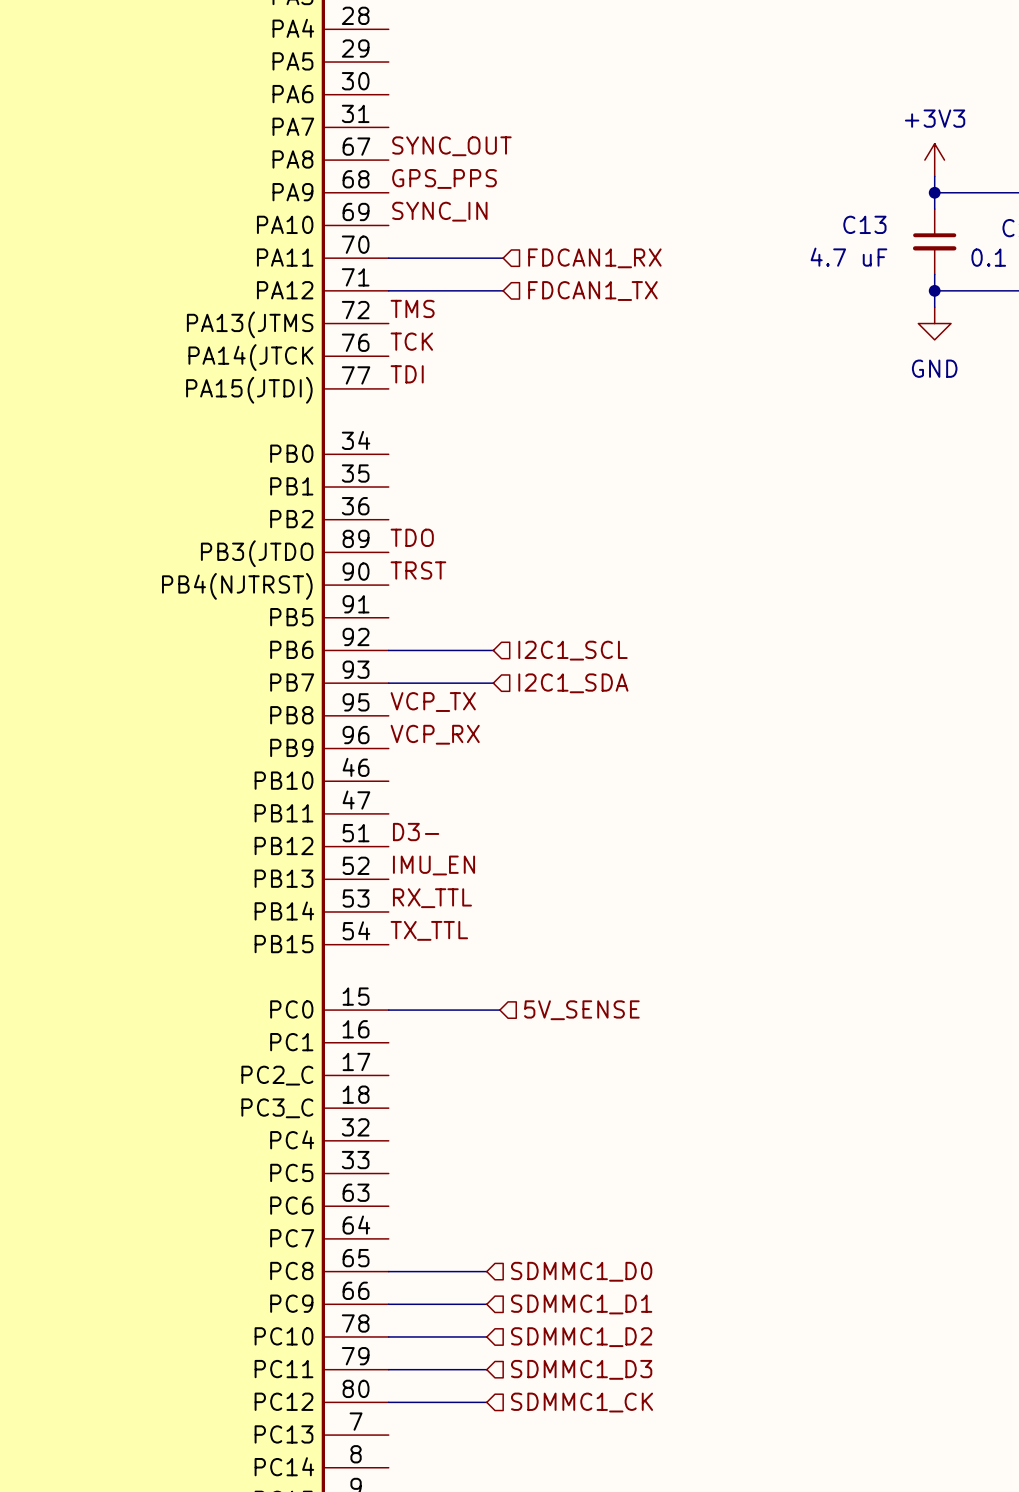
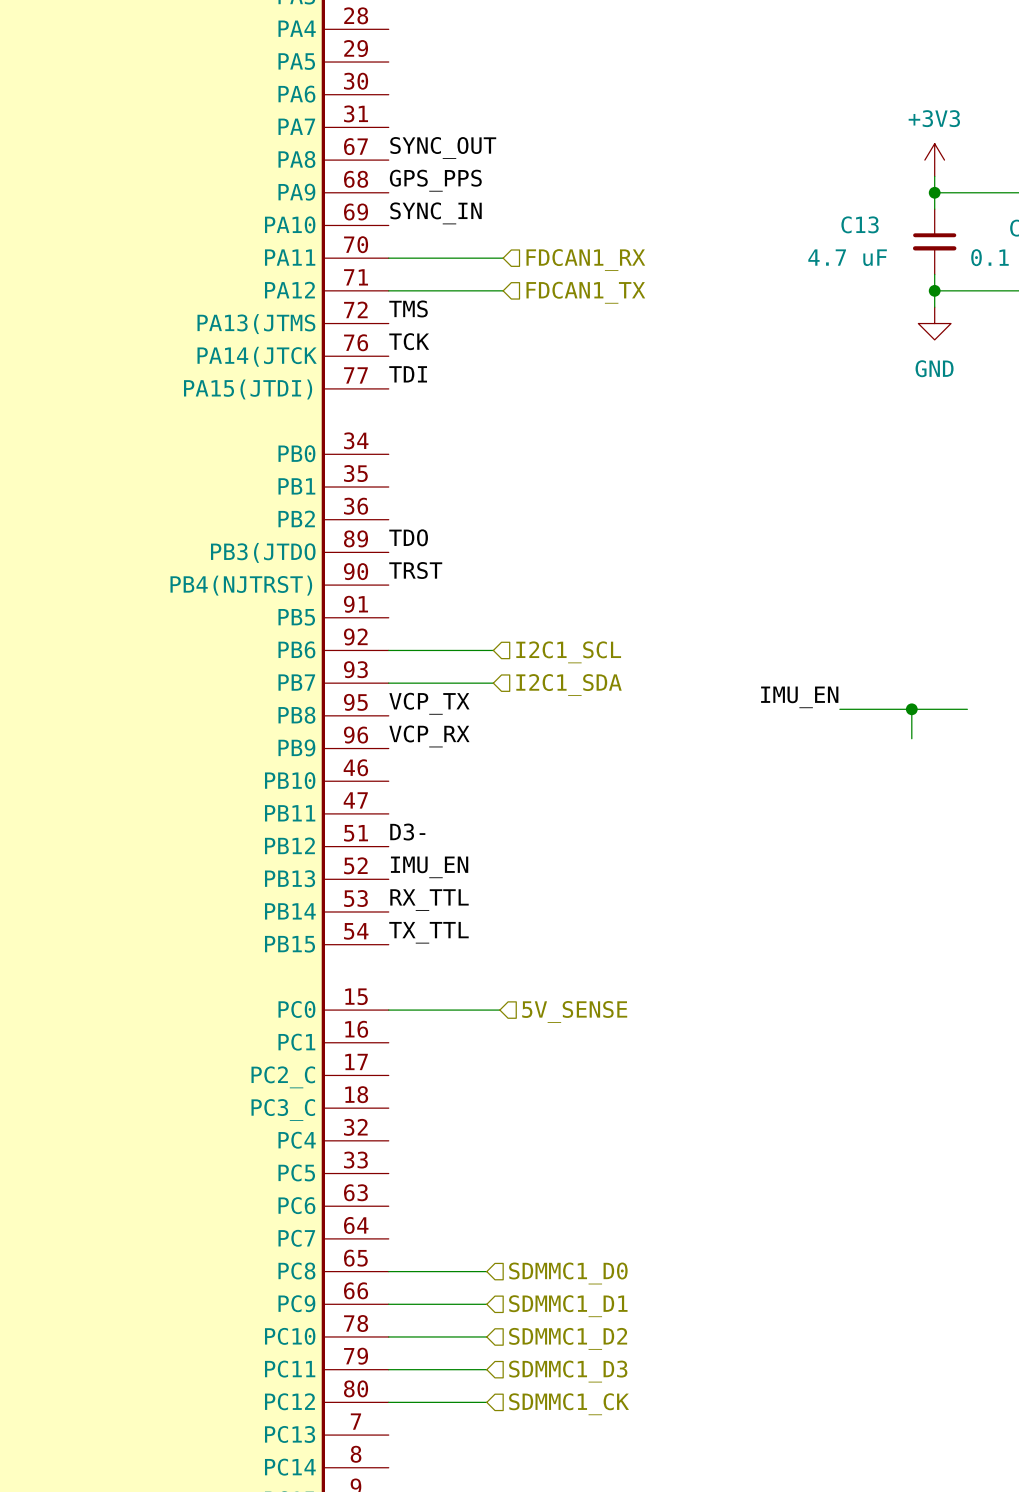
label: none -> IMU_EN (799, 697)
wire: none -> (839, 709) (967, 709)
wire: none -> (911, 709) (911, 738)
junction: none -> (911, 709)

